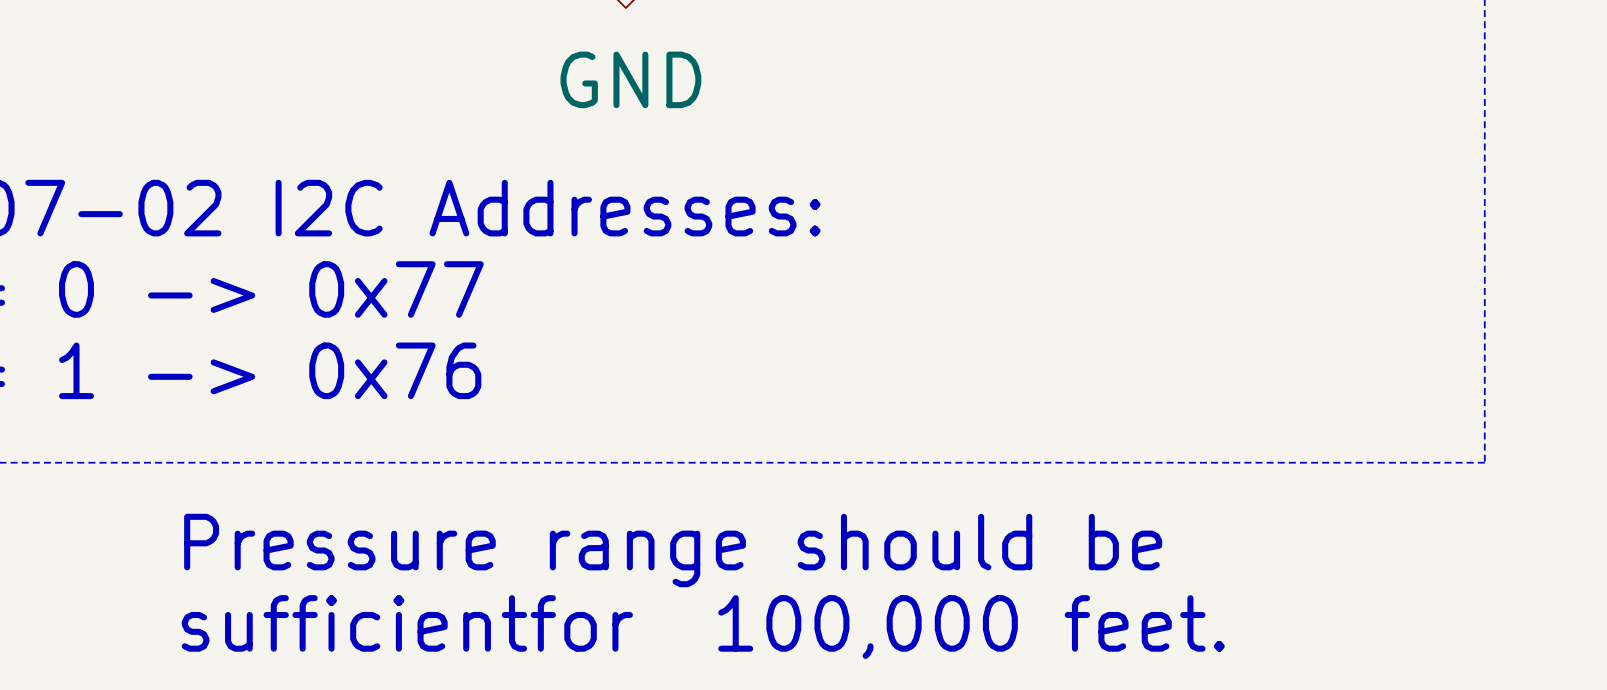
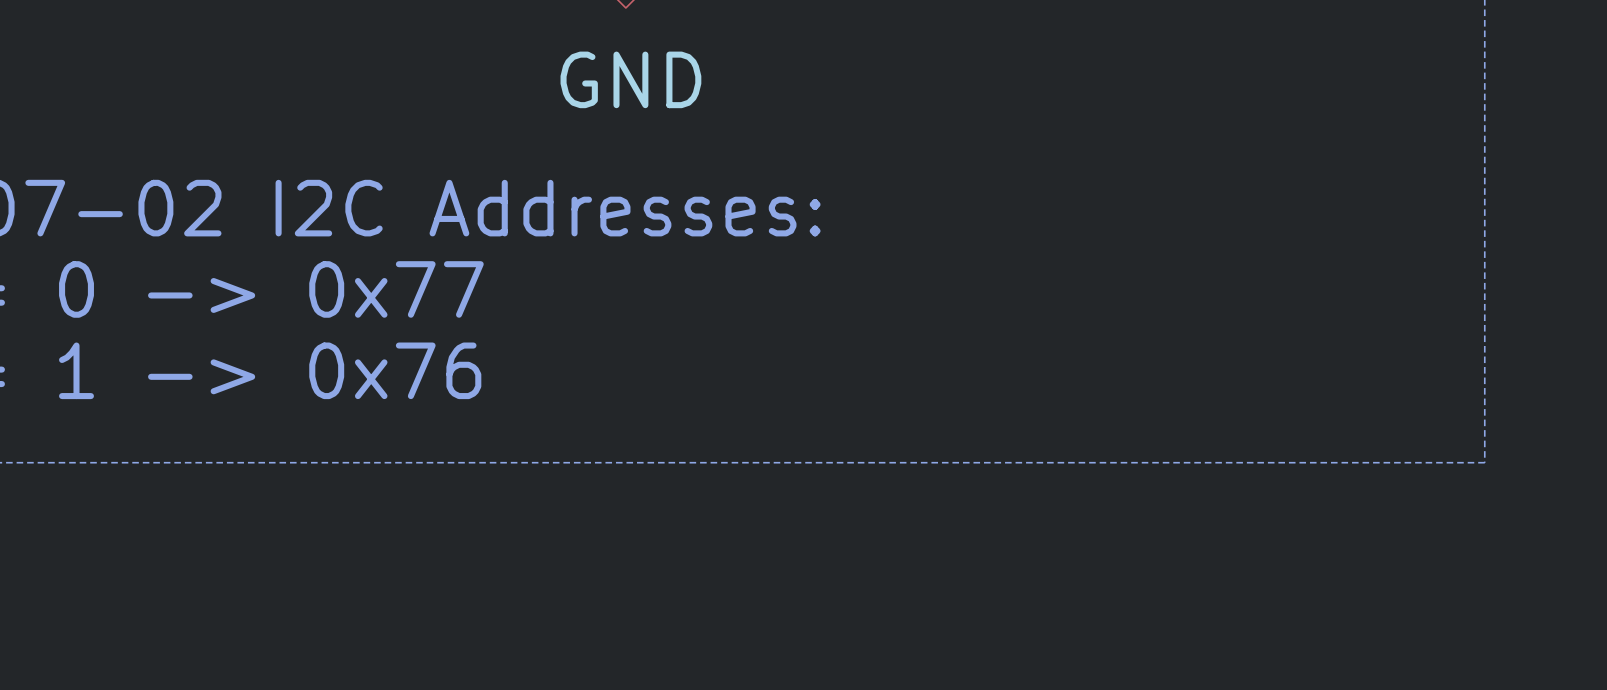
text: Pressure range should be (673, 550) -> none
text: sufficientfor 100,000 feet. (703, 627) -> none

